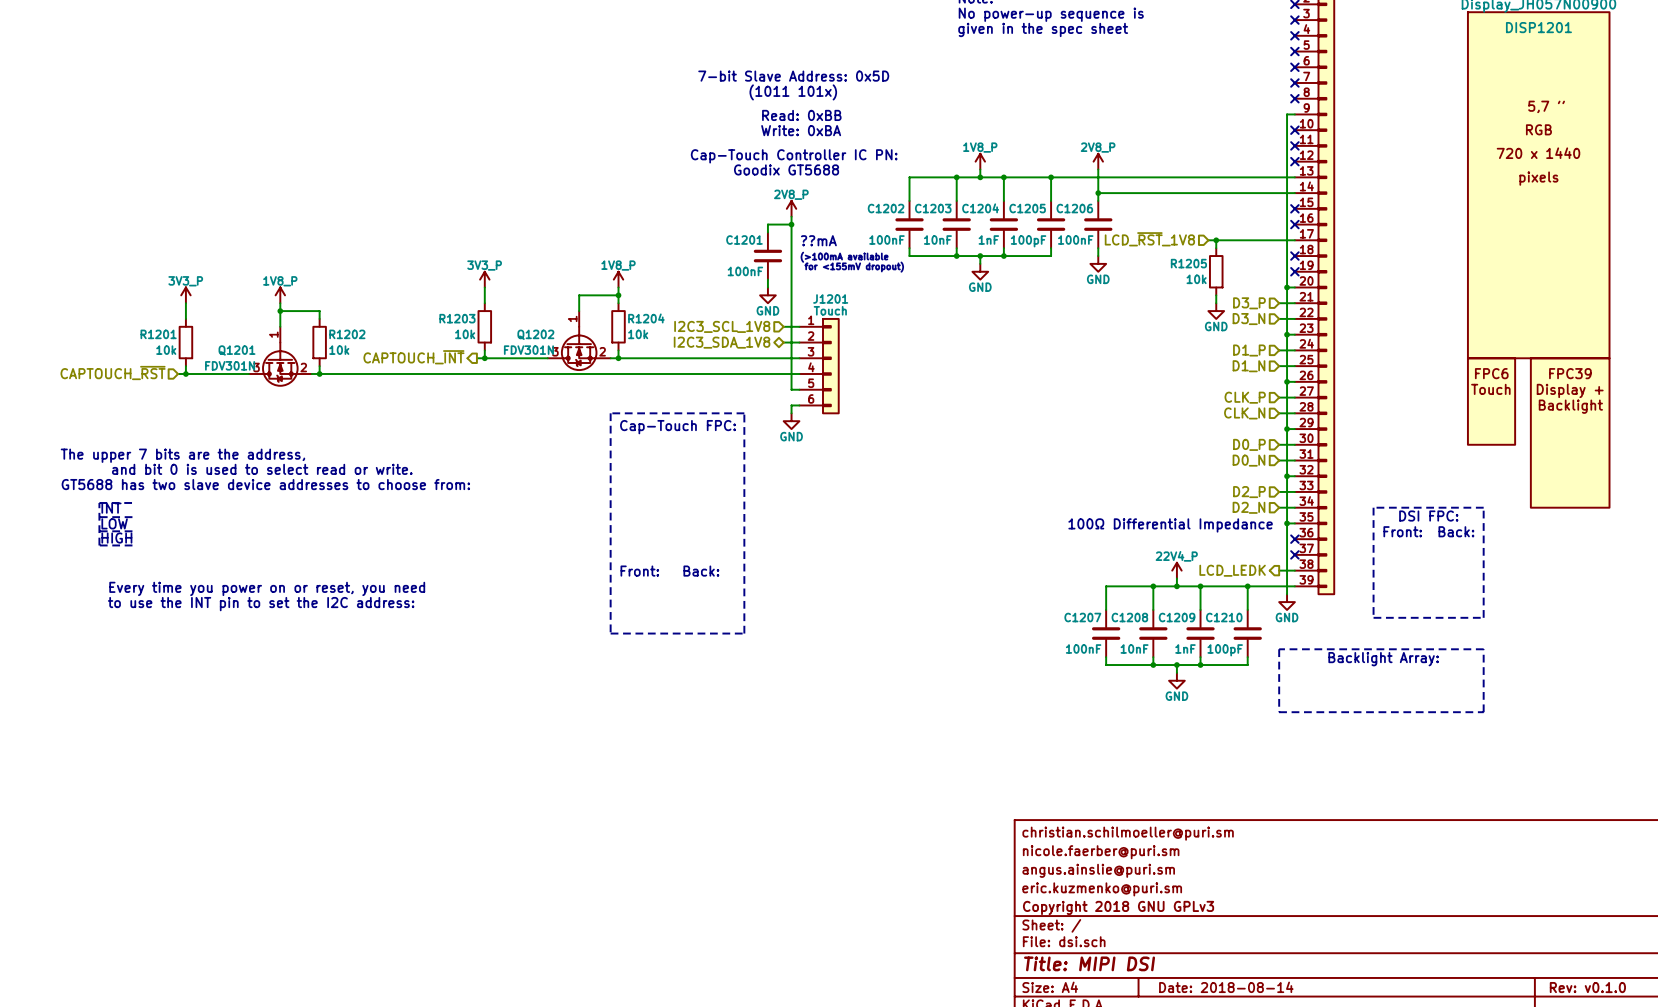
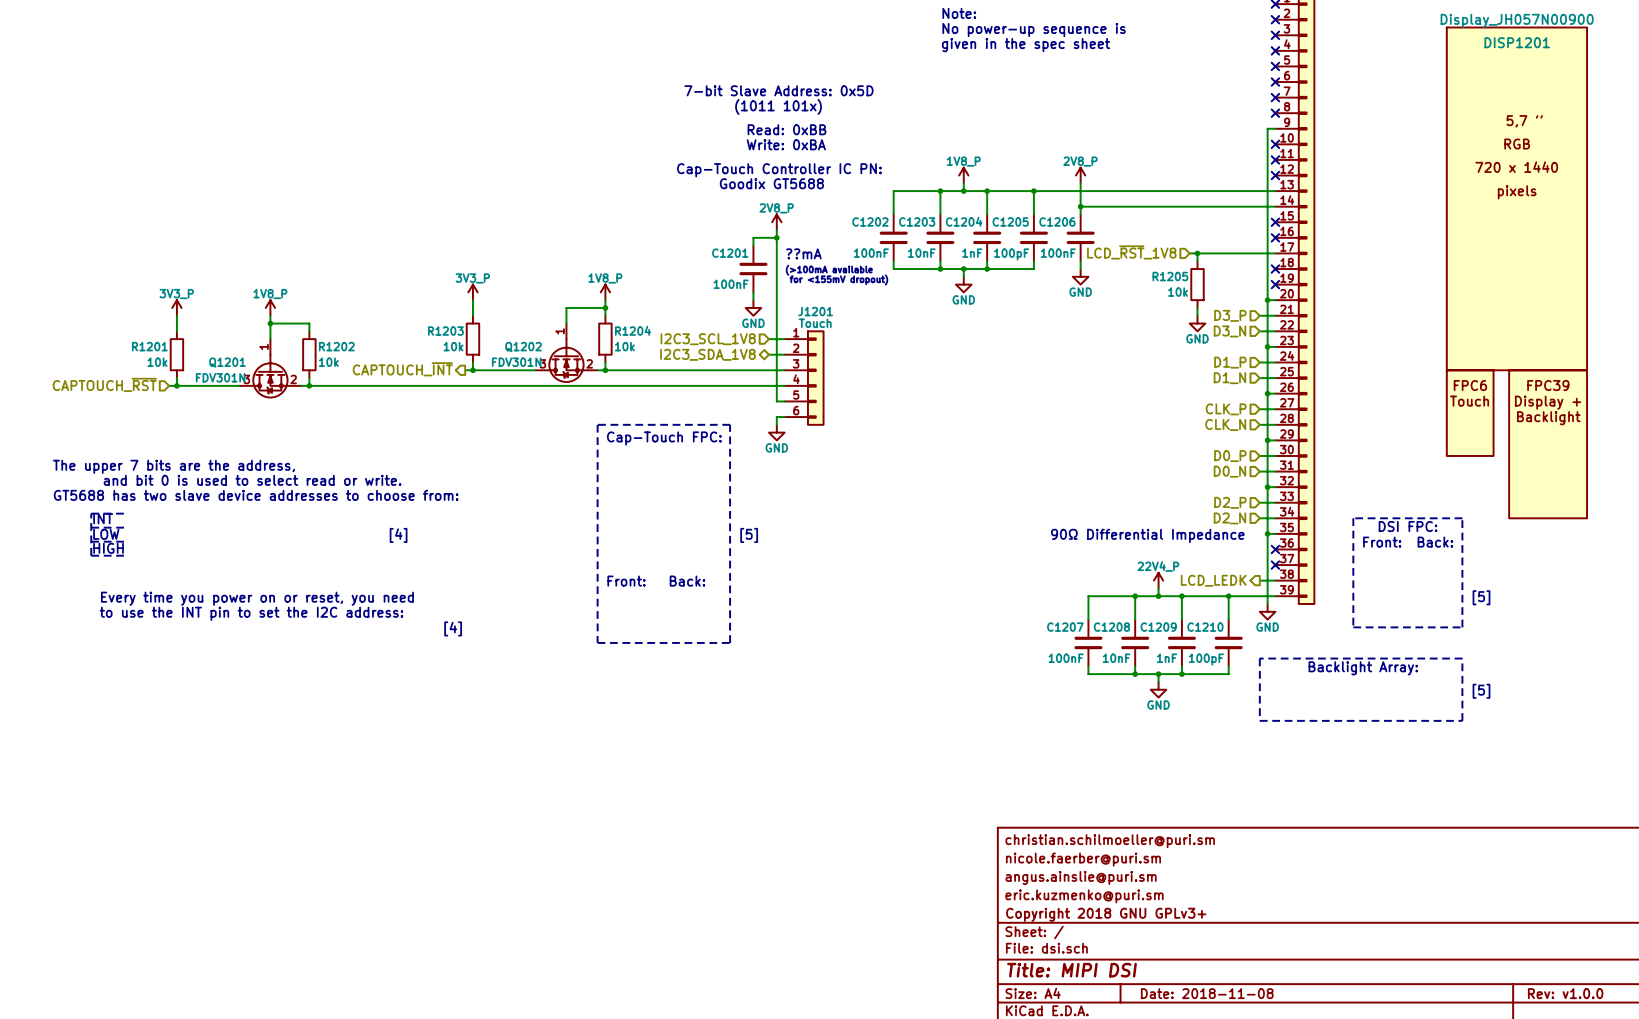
text: none -> [4] (398, 535)
text: none -> [5] (749, 535)
text: 100Ω Differential Impedance (1170, 525) -> 90Ω Differential Impedance (1147, 535)
text: none -> [5] (1481, 597)
text: none -> [4] (453, 628)
text: none -> [5] (1481, 691)
title block: Copyright 2018 GNU GPLv3 (1118, 907) -> Copyright 2018 GNU GPLv3+ (1106, 914)
title block: Date: 2018-08-14 (1226, 987) -> Date: 2018-11-08 (1207, 993)
title block: Rev: v0.1.0 (1587, 987) -> Rev: v1.0.0 (1565, 993)

